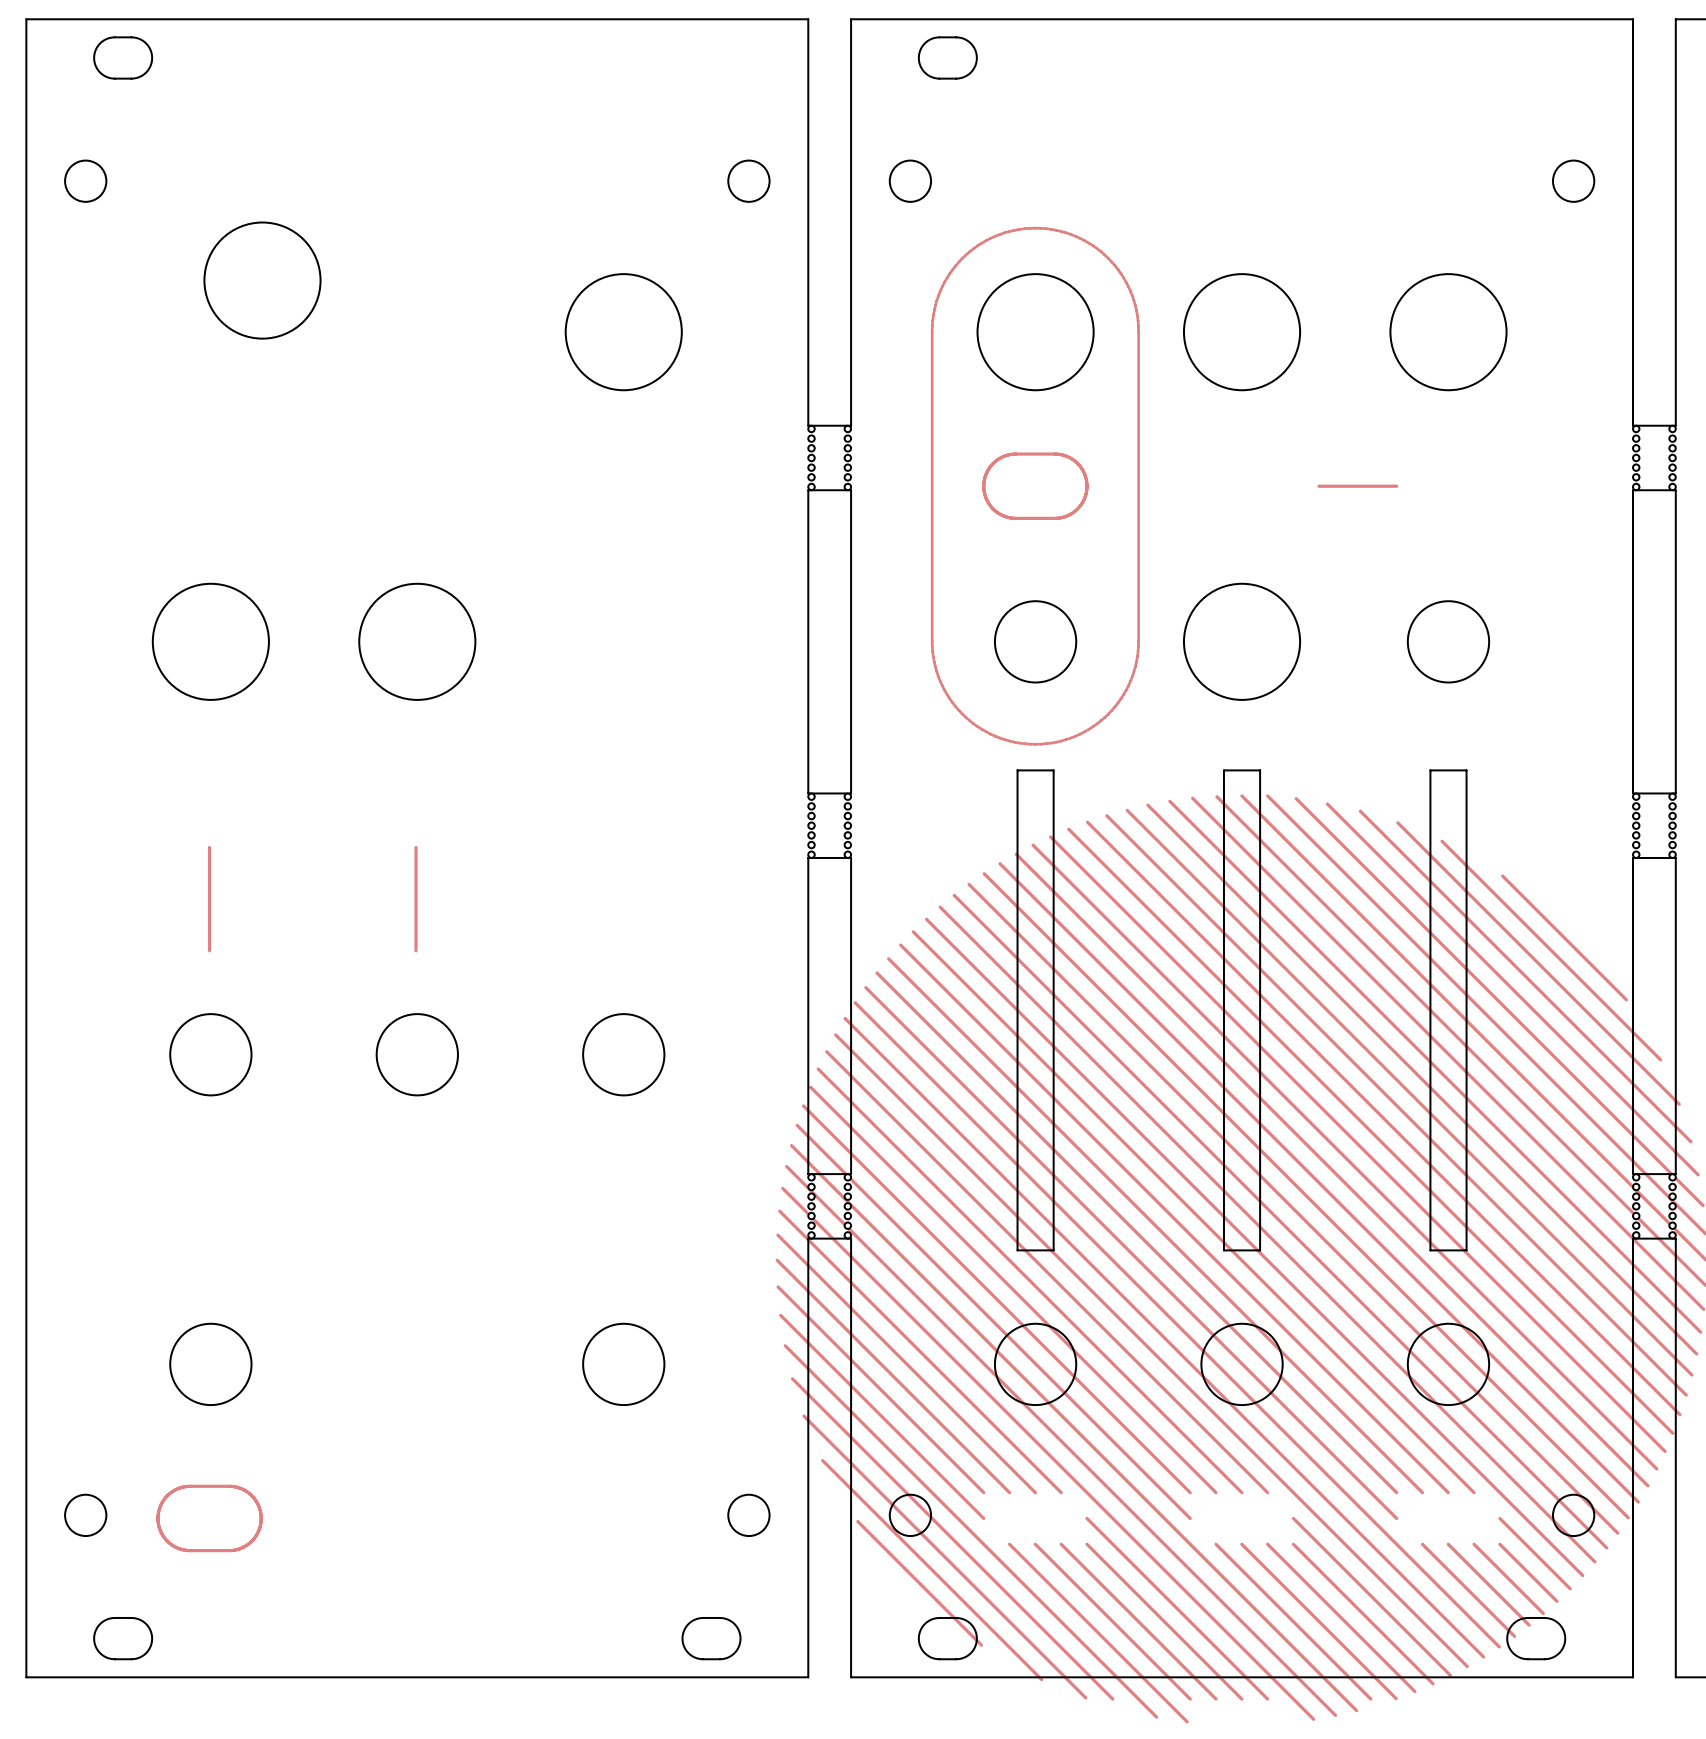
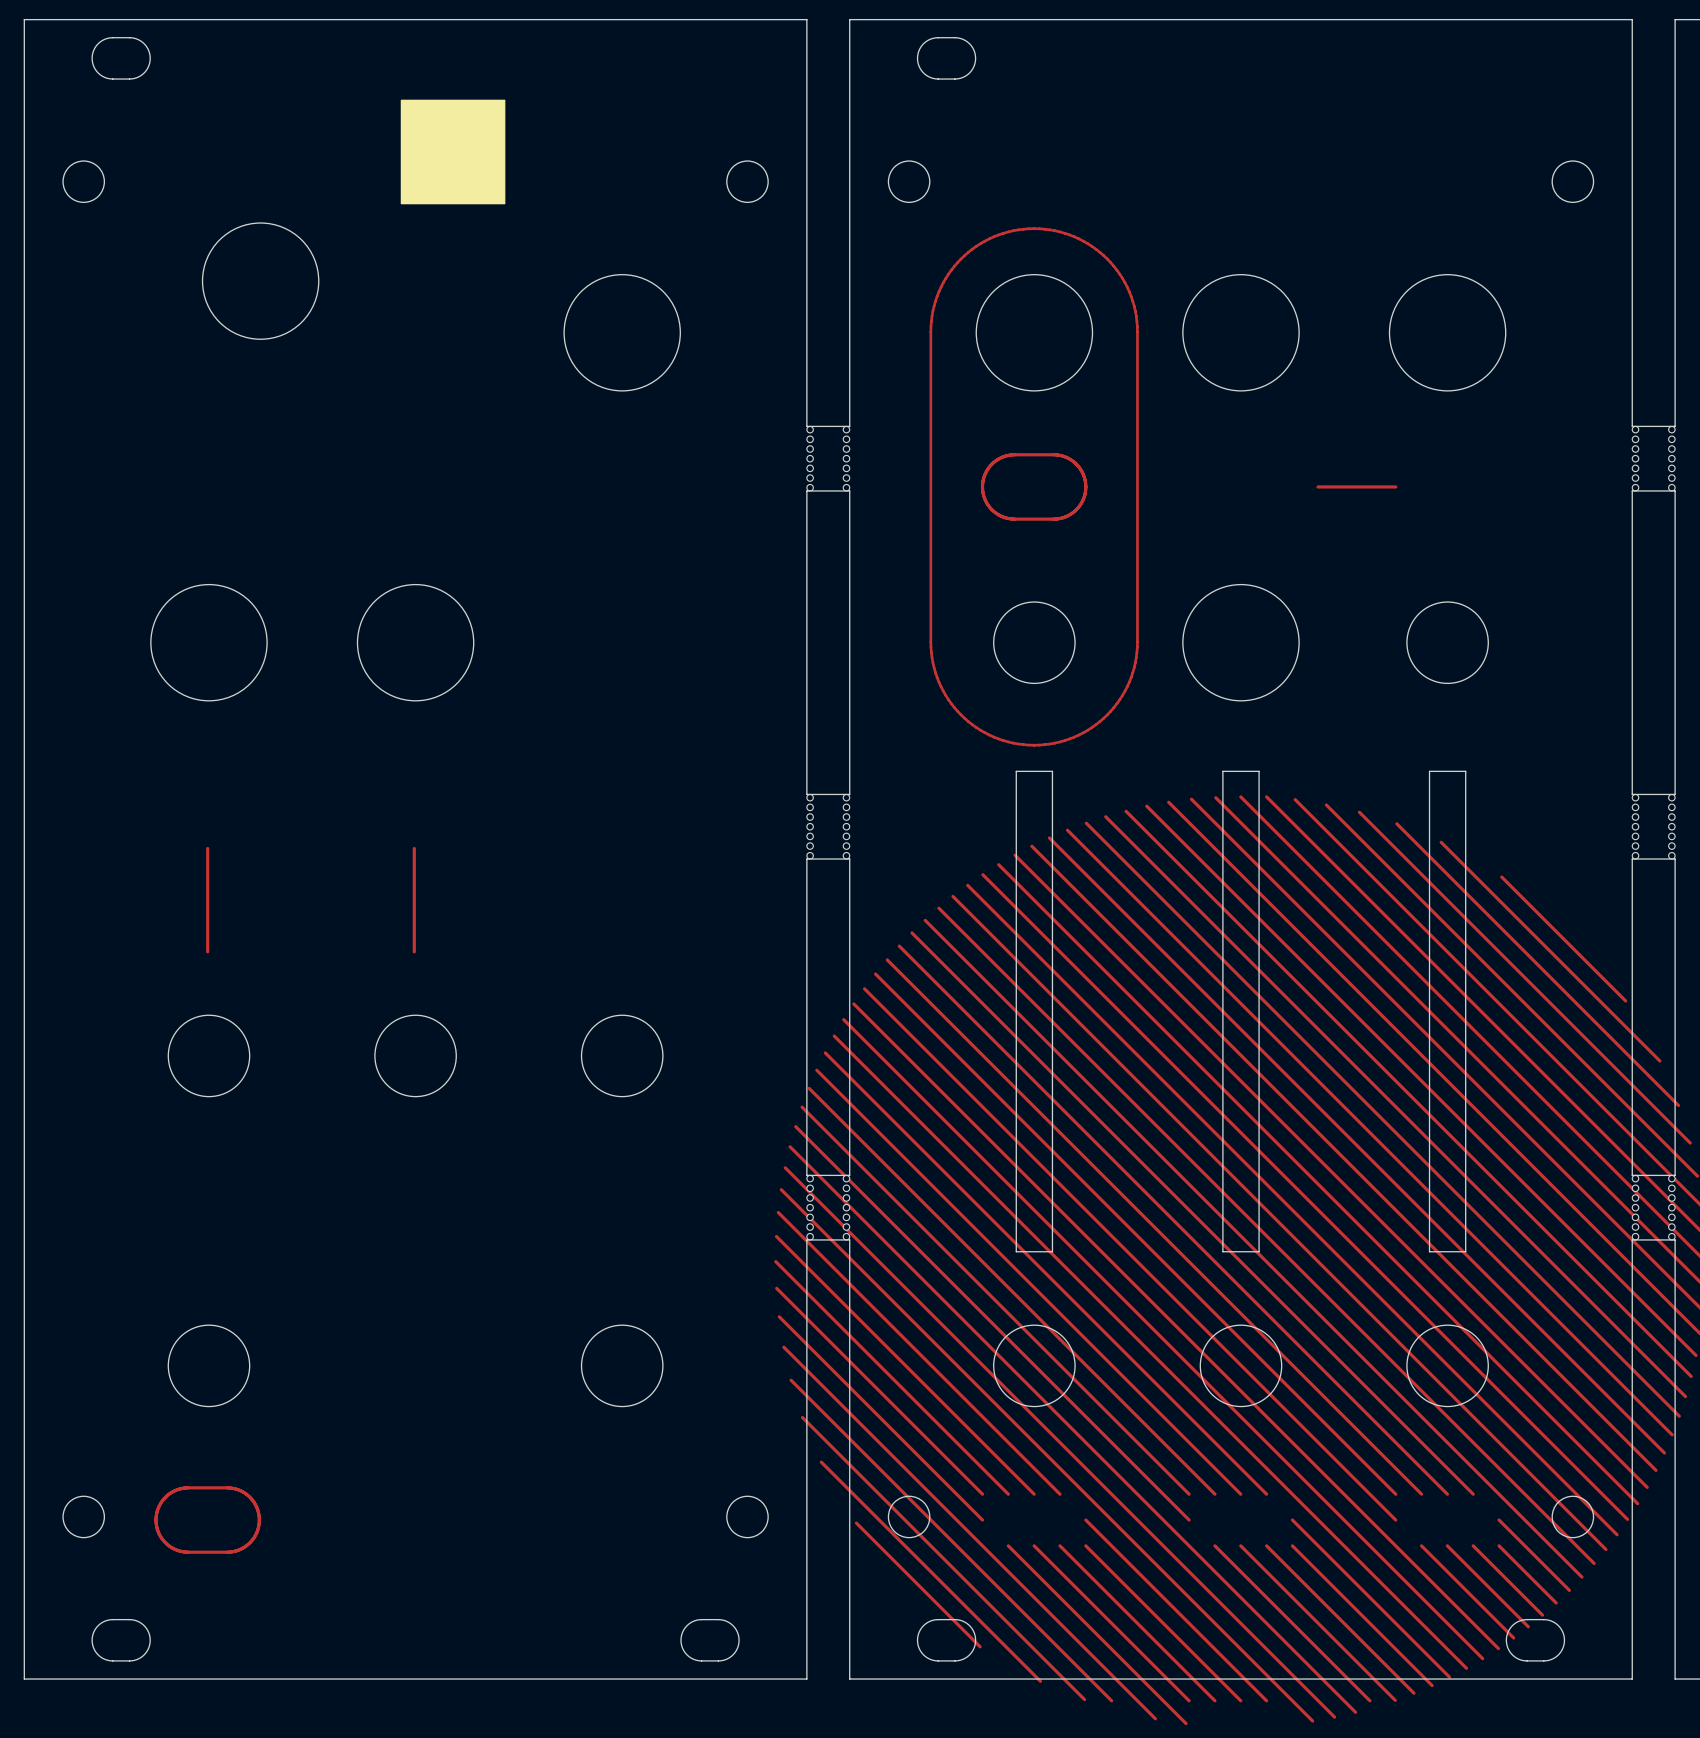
drawing: none -> [400, 99, 506, 205]

